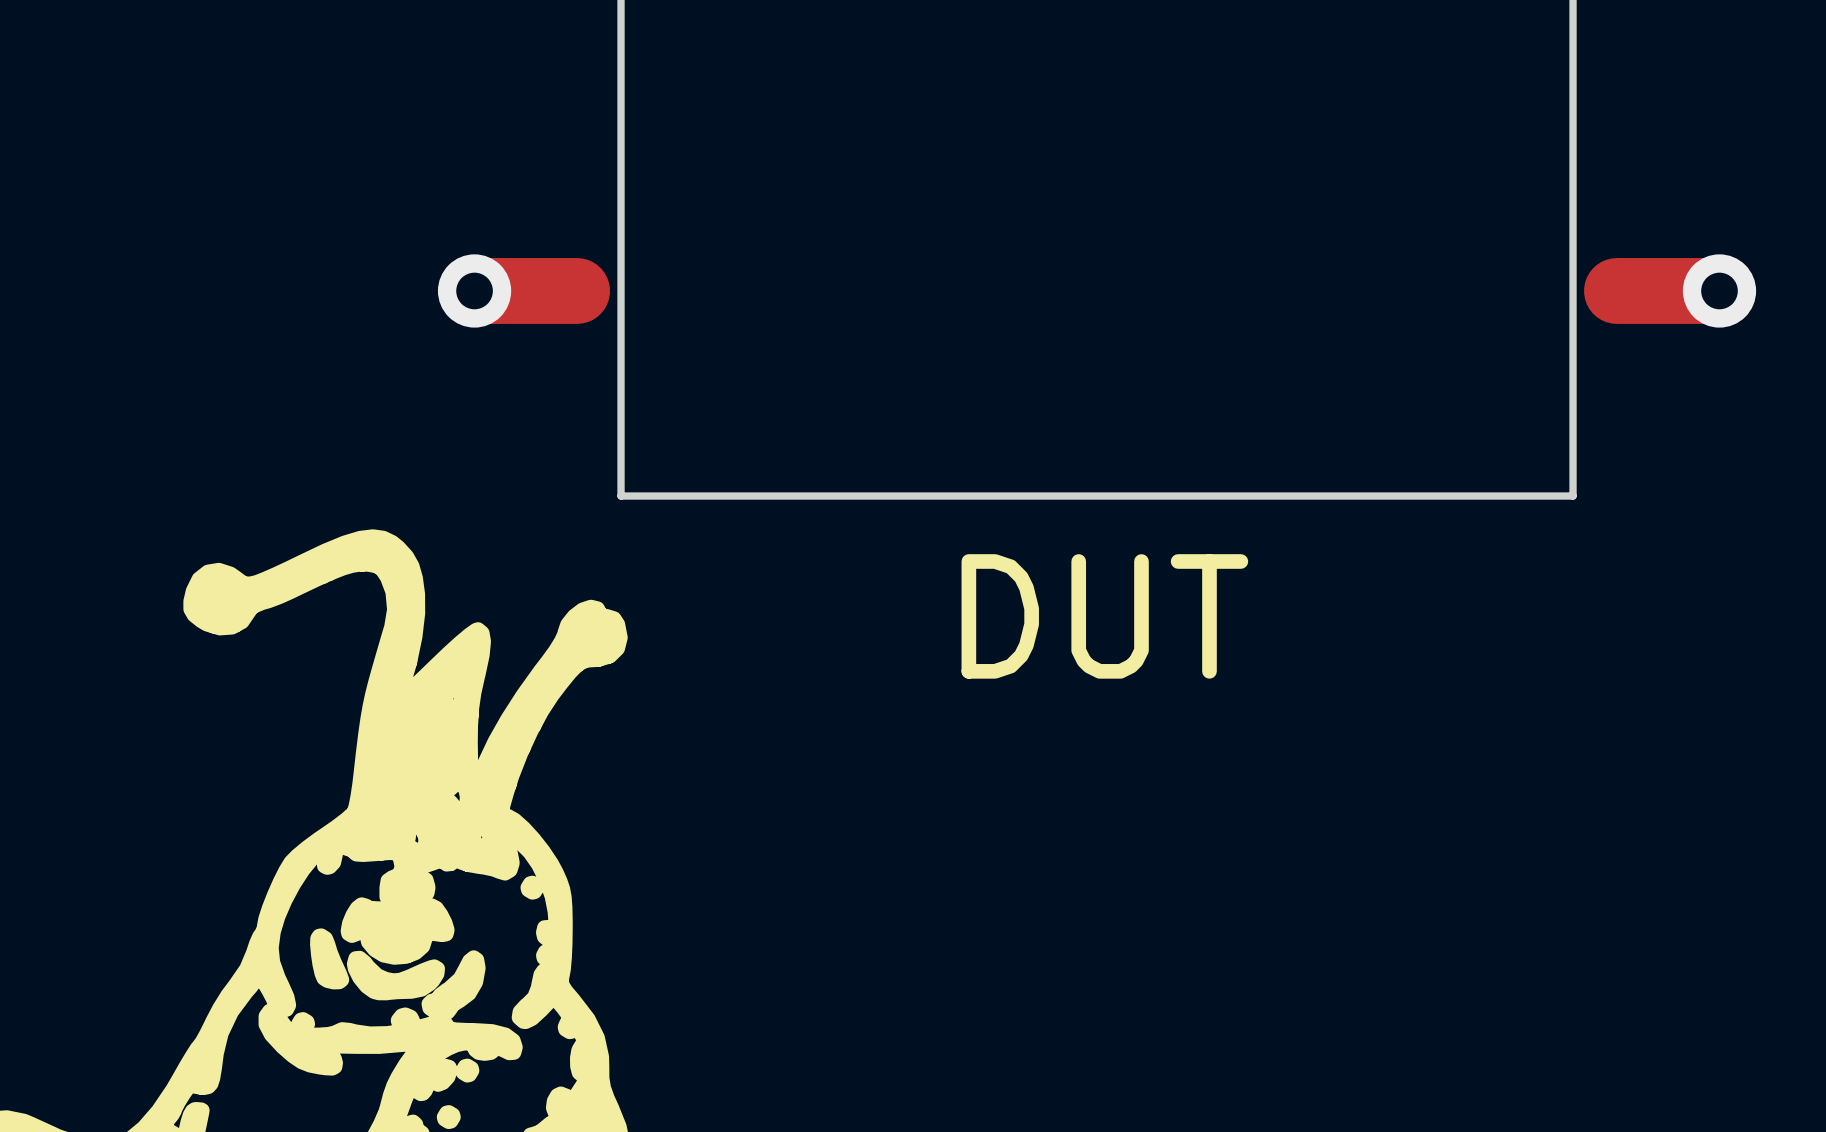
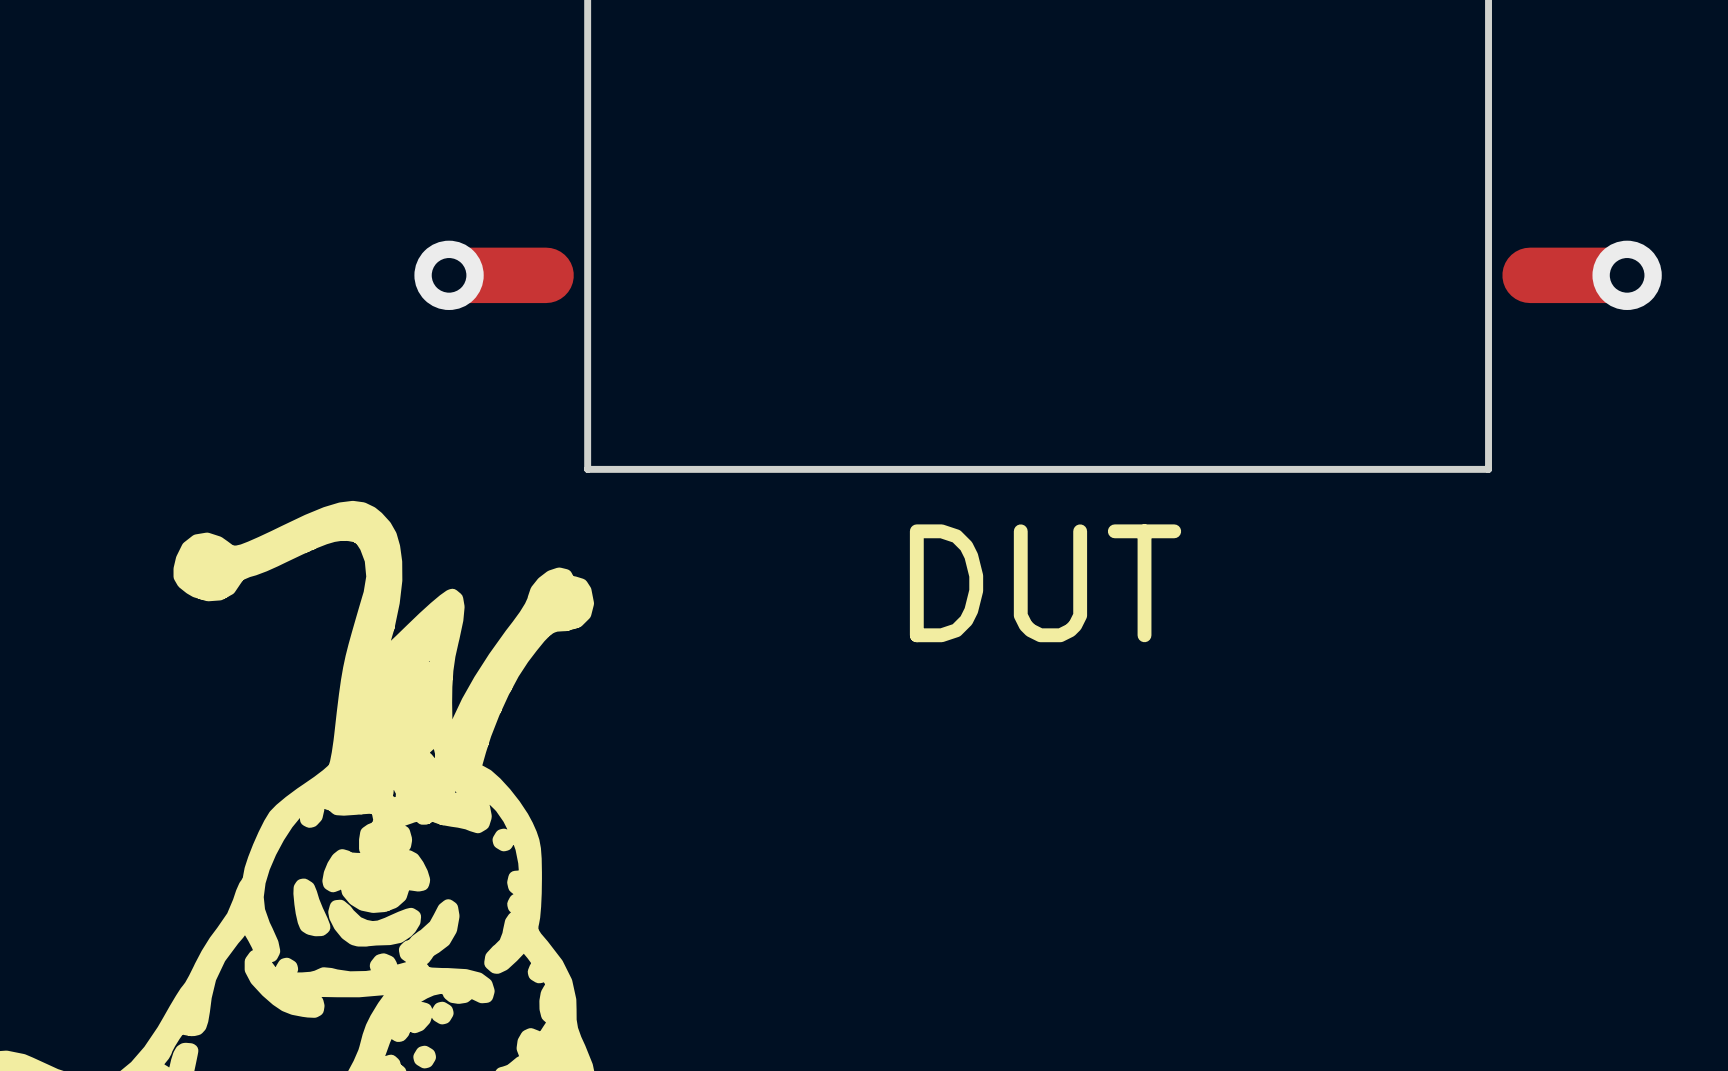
top track width: thick (474, 290) (577, 290) -> thin (449, 275) (546, 275)
top track width: thick (1616, 290) (1719, 290) -> thin (1530, 275) (1627, 275)

